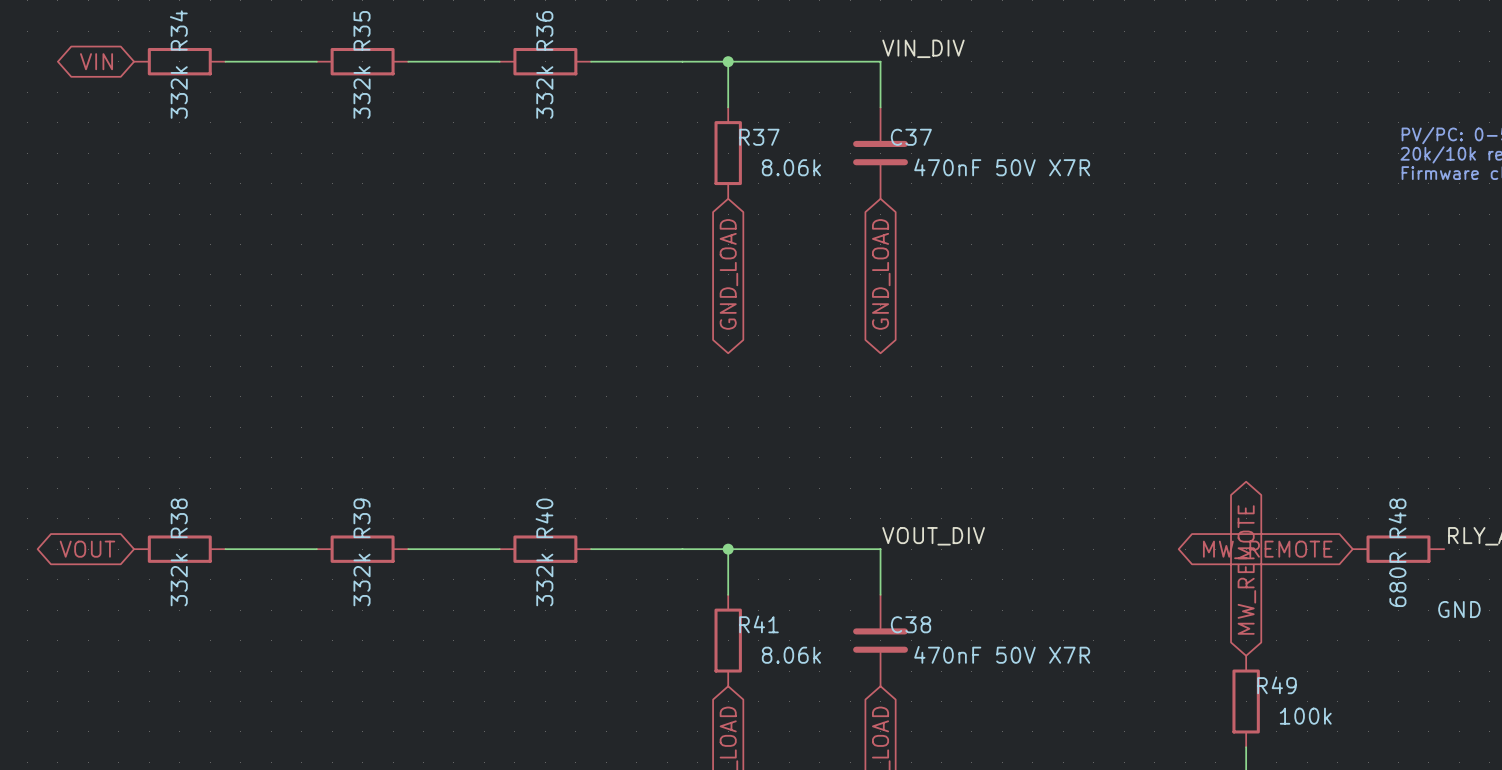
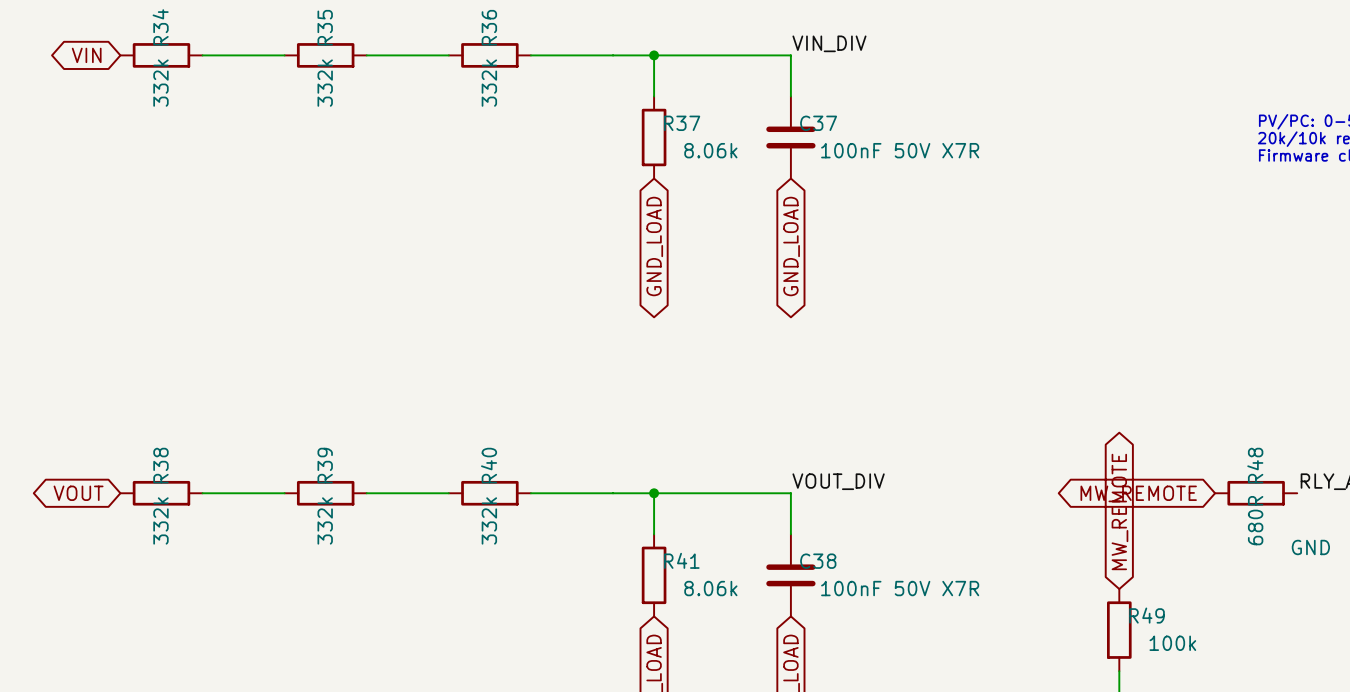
C37 value: 470nF 50V X7R (1002, 167) -> 100nF 50V X7R (900, 150)
C38 value: 470nF 50V X7R (1002, 654) -> 100nF 50V X7R (900, 588)

